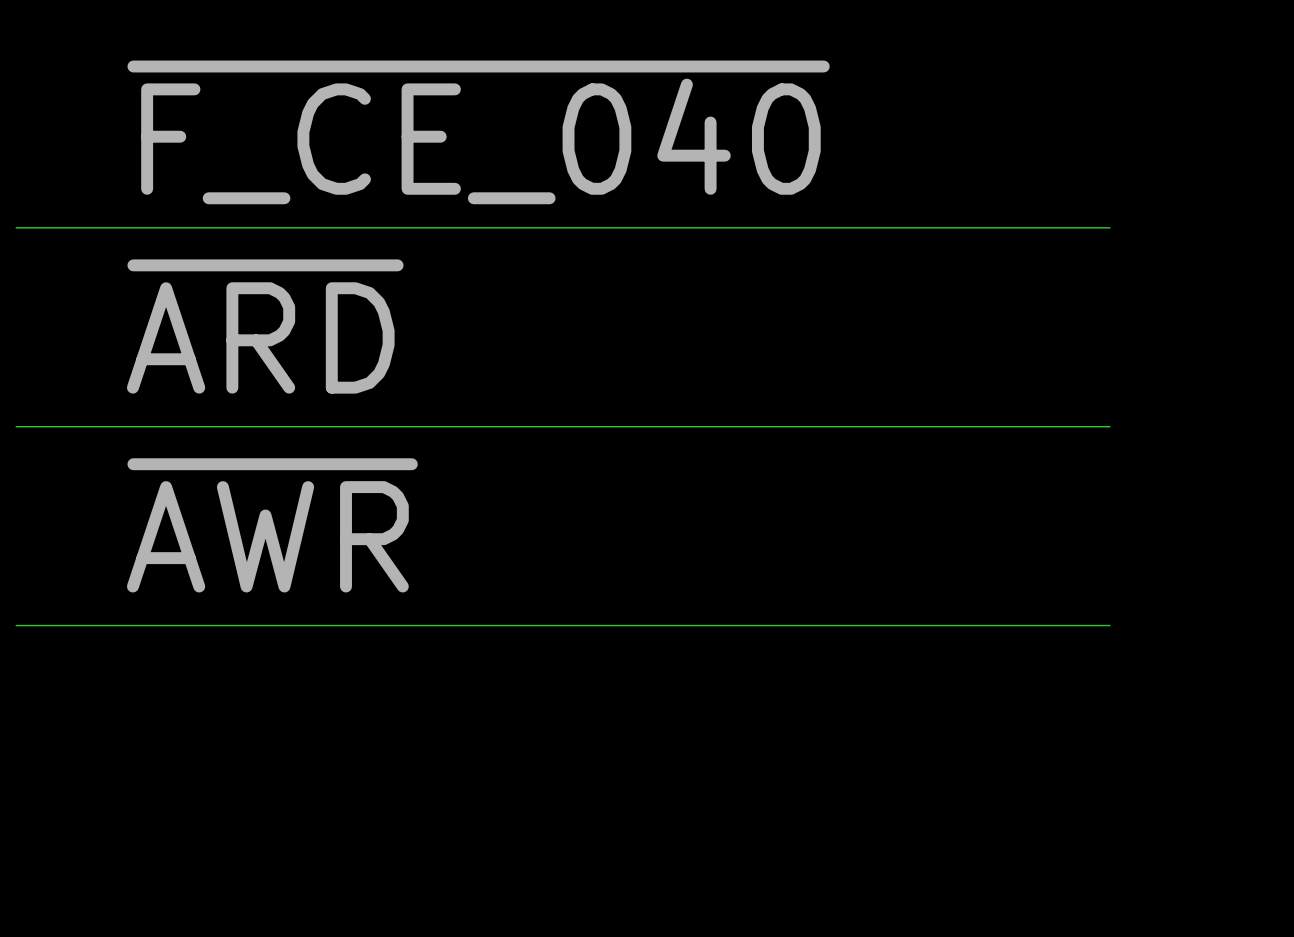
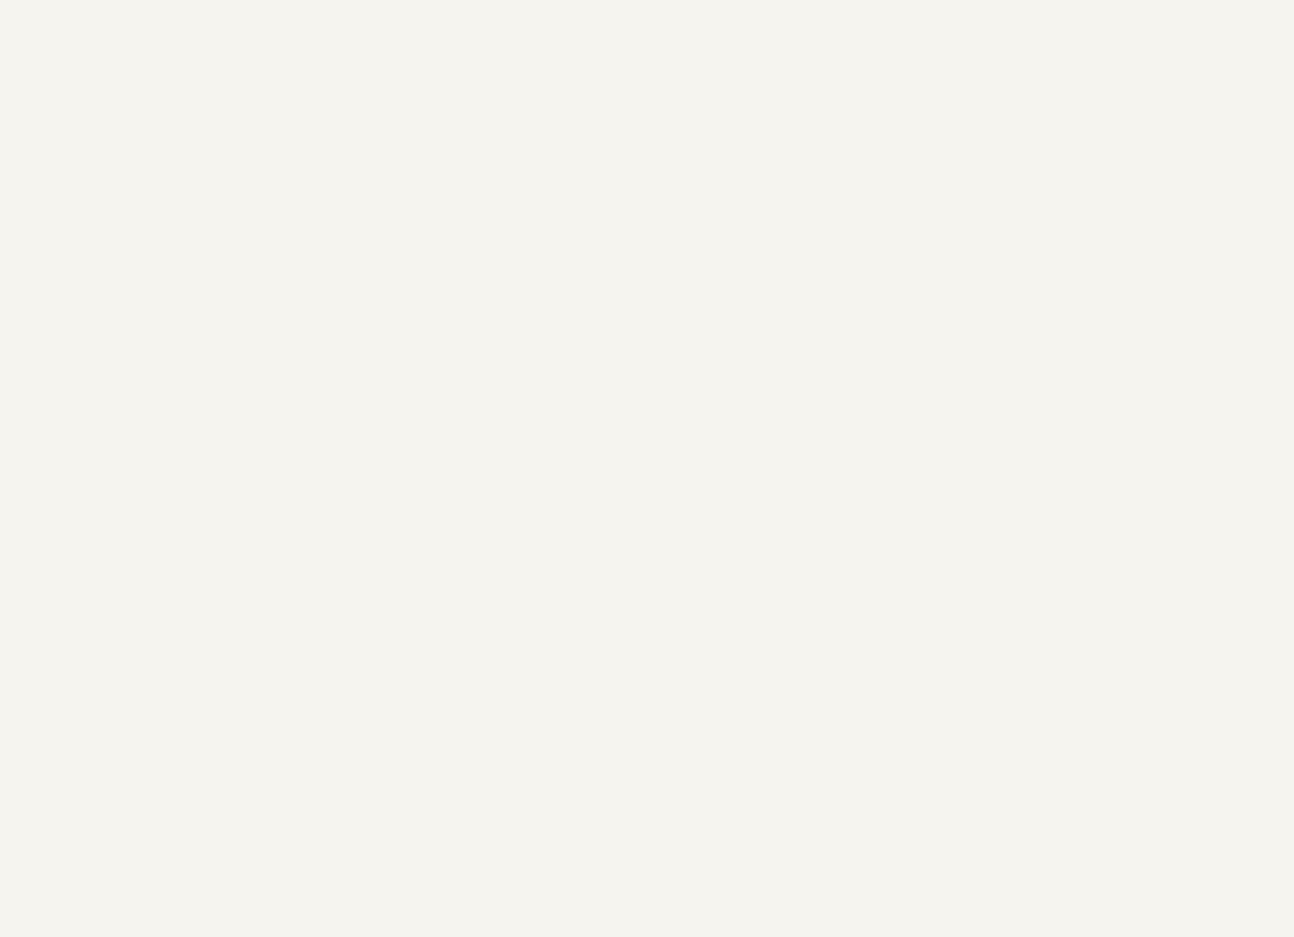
label: ~{F_CE_040} (478, 132) -> none
wire: (16, 227) (1109, 227) -> none
label: ~{ARD} (265, 326) -> none
wire: (16, 426) (1109, 426) -> none
label: ~{AWR} (272, 525) -> none
wire: (16, 625) (1109, 625) -> none

